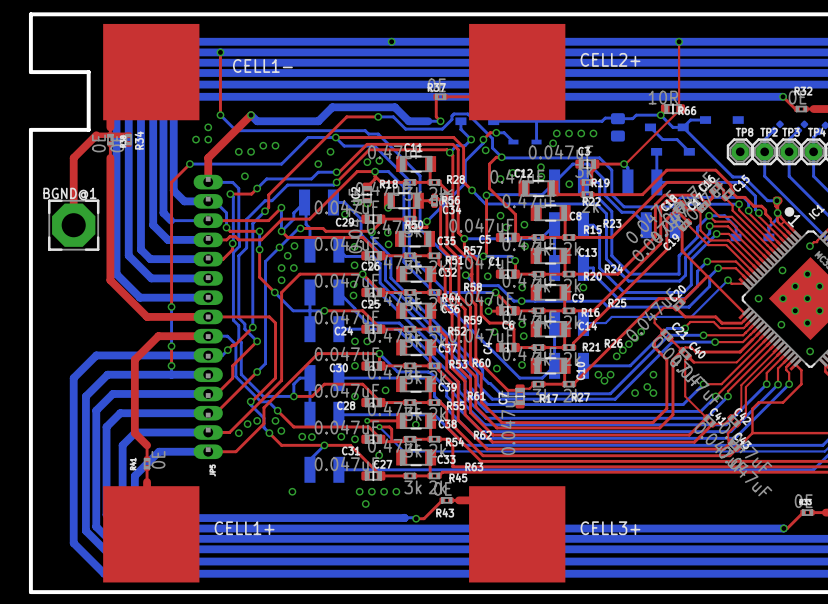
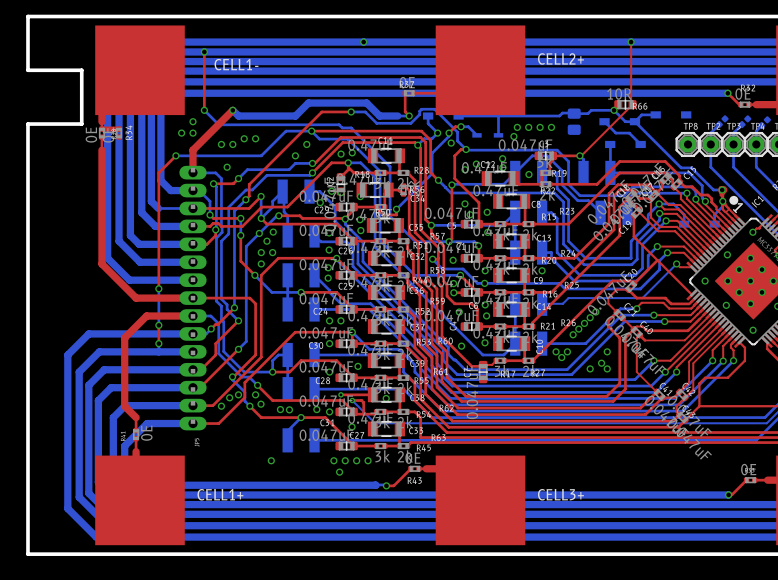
top track: (110, 135) (96, 135) (73, 157) (73, 225) -> none
BGND@1: (73, 225) -> none

